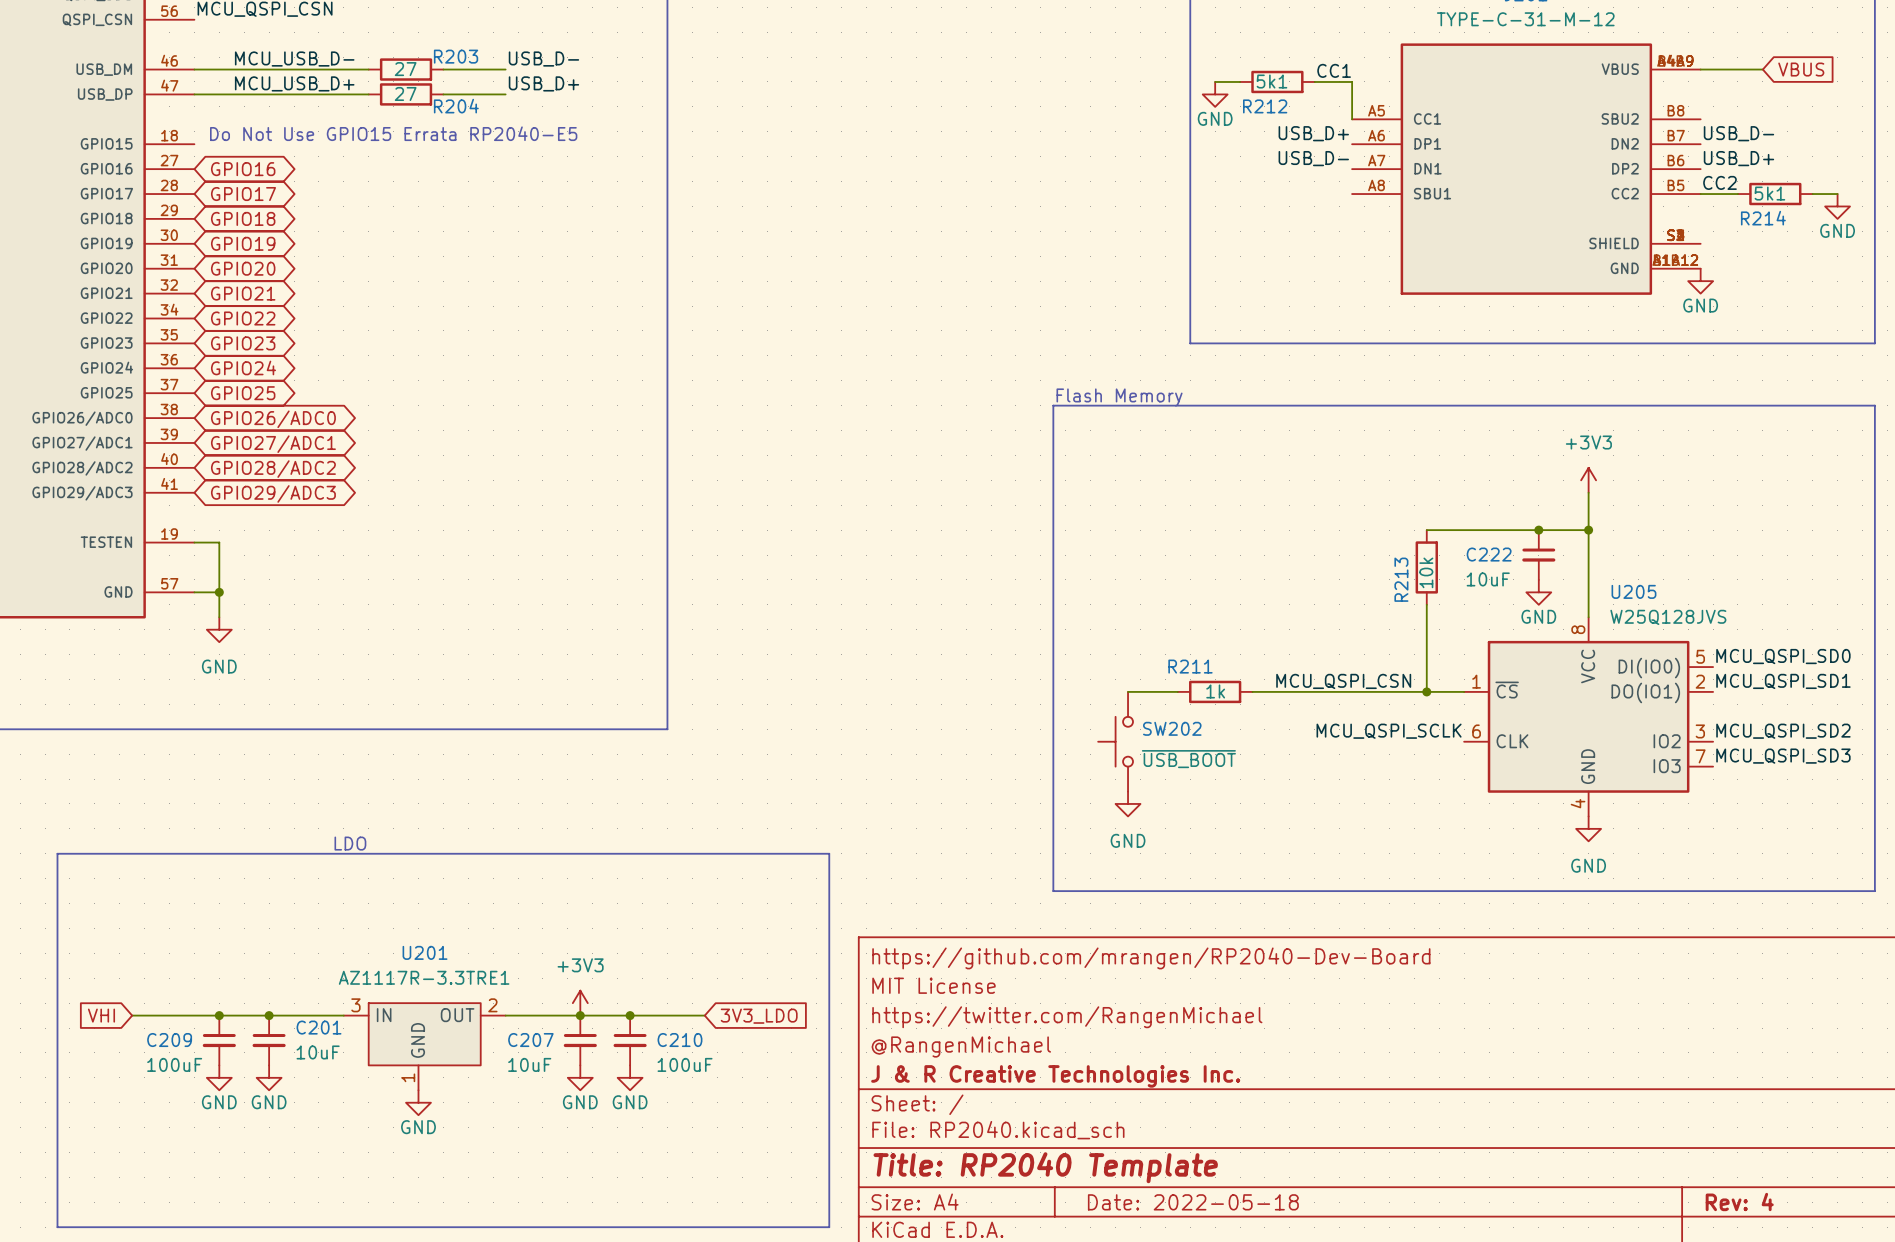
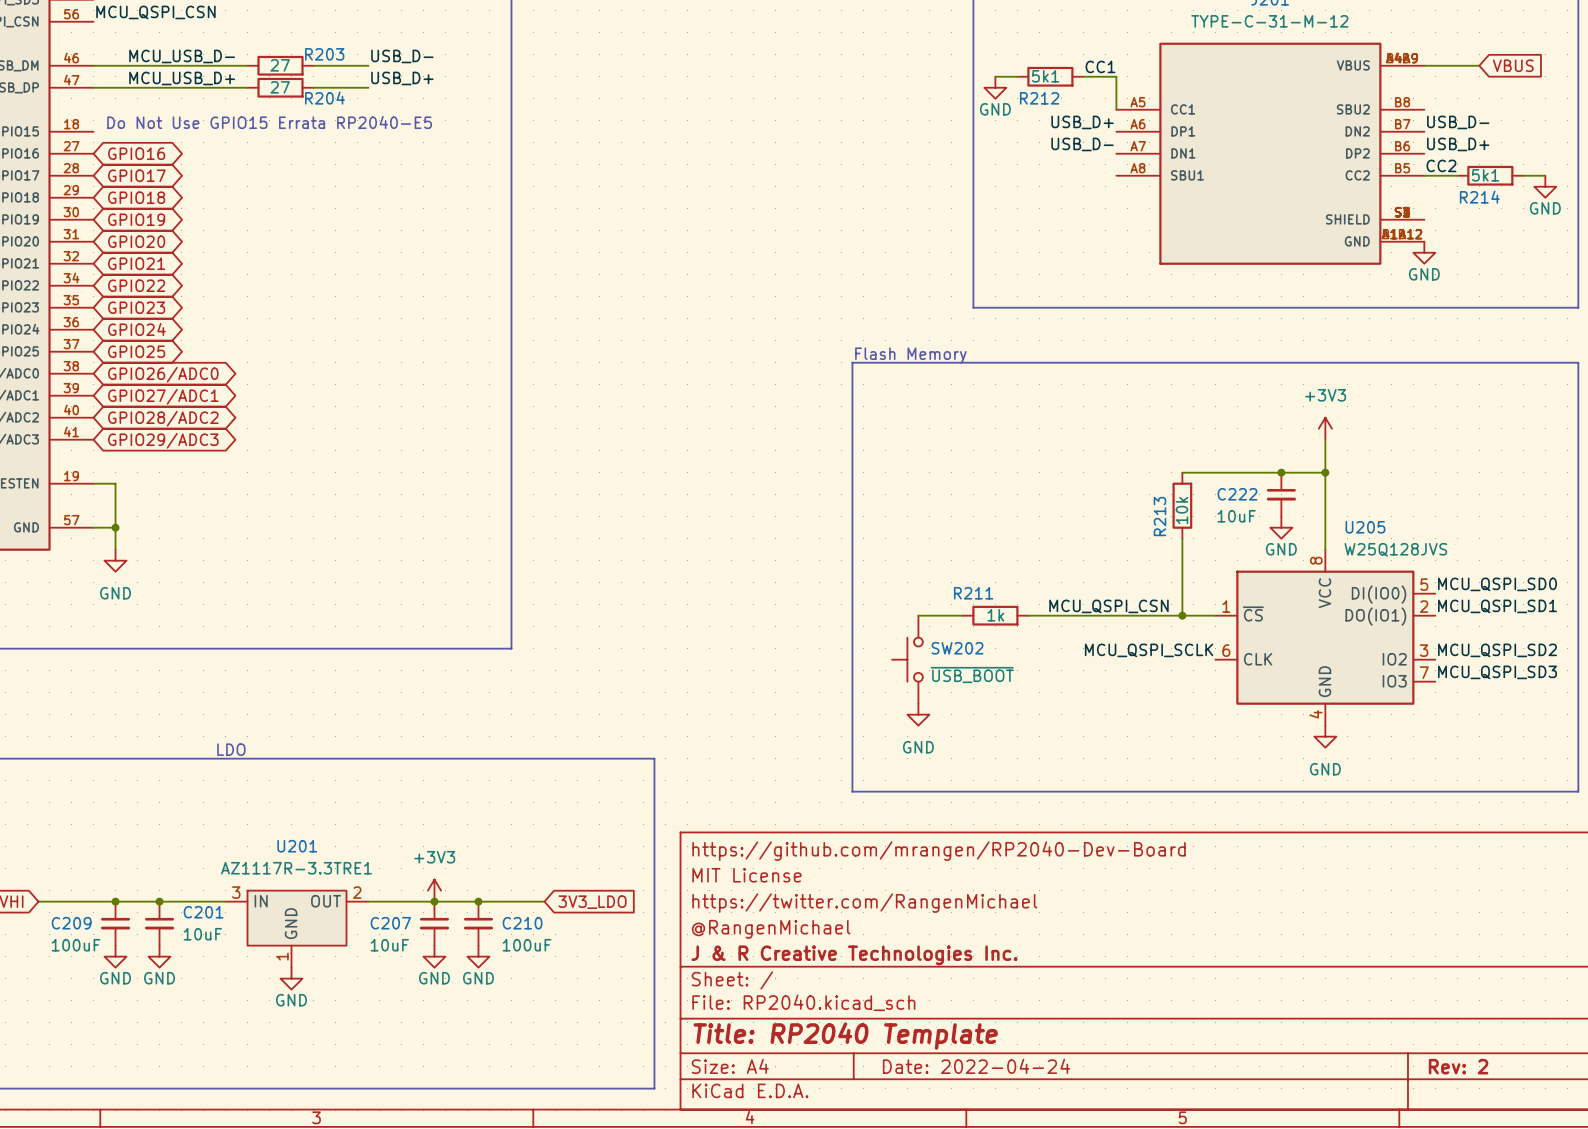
title block: Date: 2022-05-18 (1193, 1202) -> Date: 2022-04-24 (976, 1066)
title block: Rev: 4 (1739, 1202) -> Rev: 2 (1458, 1066)

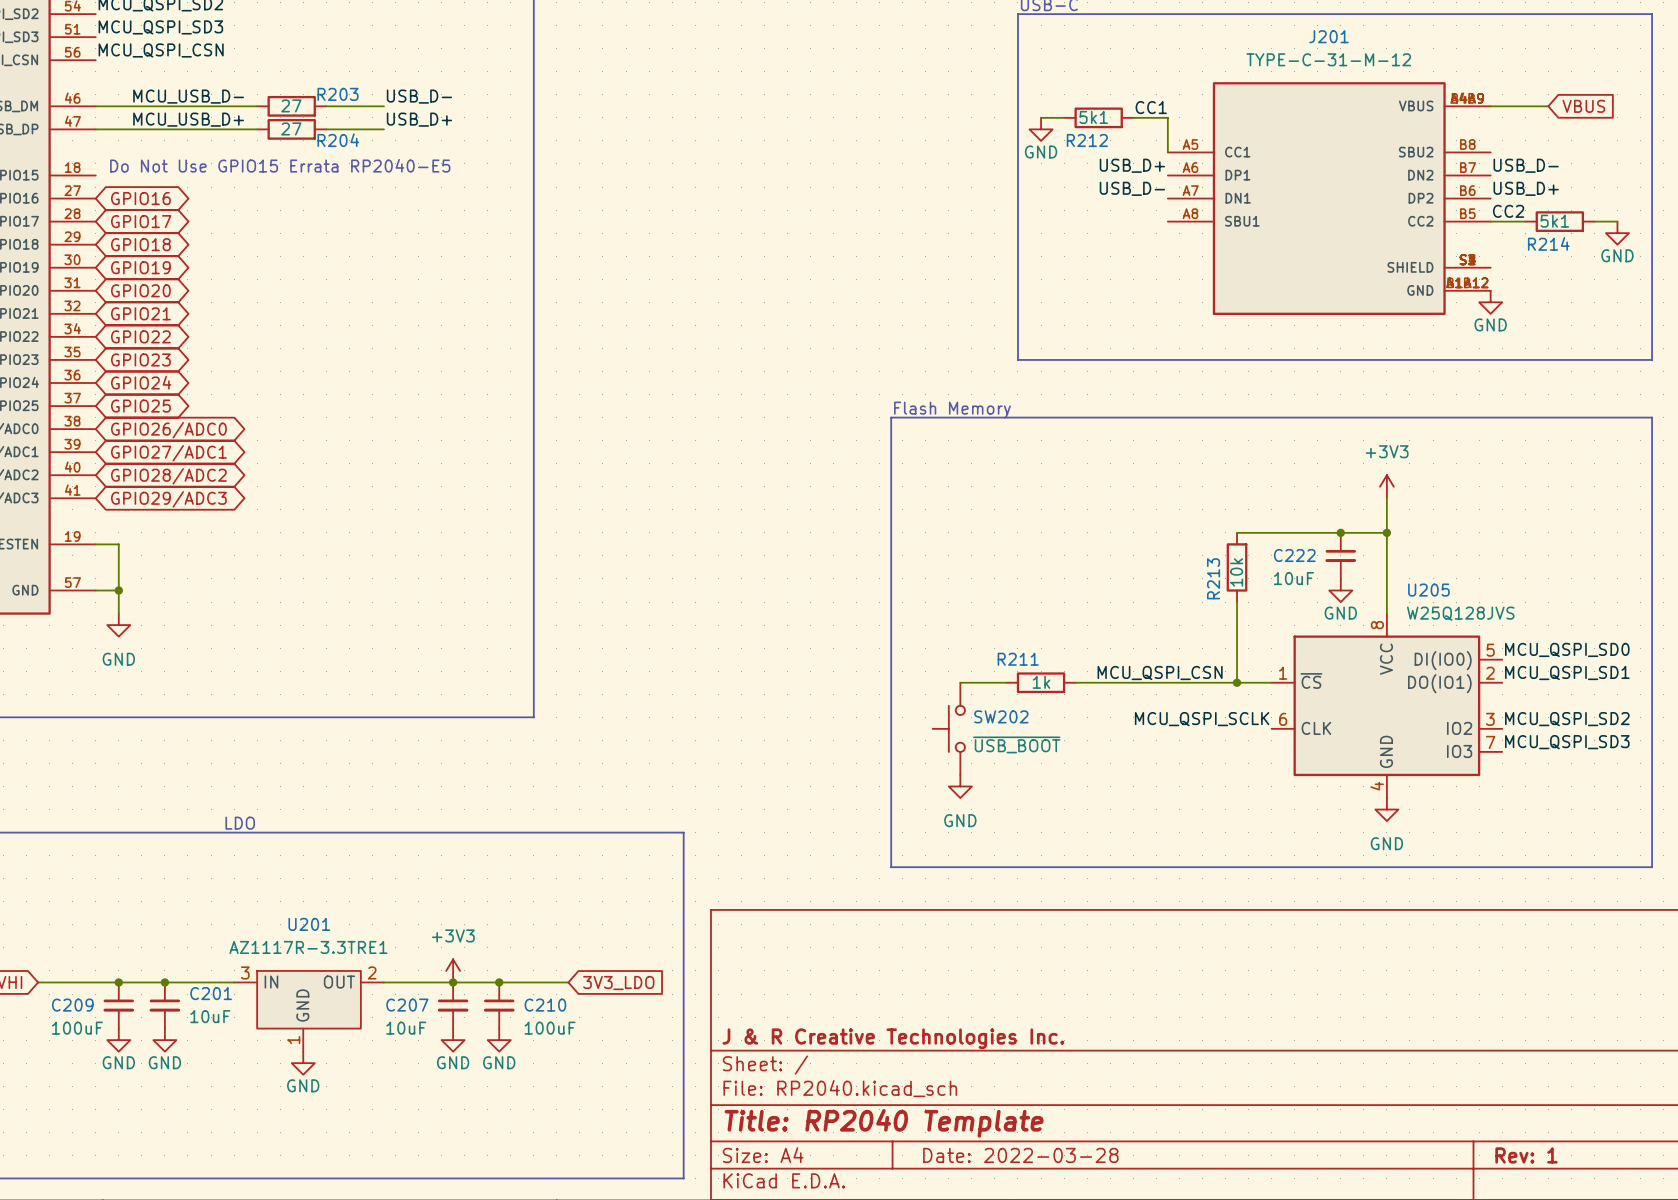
title block: https://github.com/mrangen/RP2040-Dev-Board (939, 851) -> none
title block: MIT License (746, 875) -> none
title block: https://twitter.com/RangenMichael (864, 903) -> none
title block: @RangenMichael (771, 929) -> none
title block: Date: 2022-04-24 (976, 1066) -> Date: 2022-03-28 (1020, 1155)
title block: Rev: 2 (1458, 1066) -> Rev: 1 (1526, 1155)

